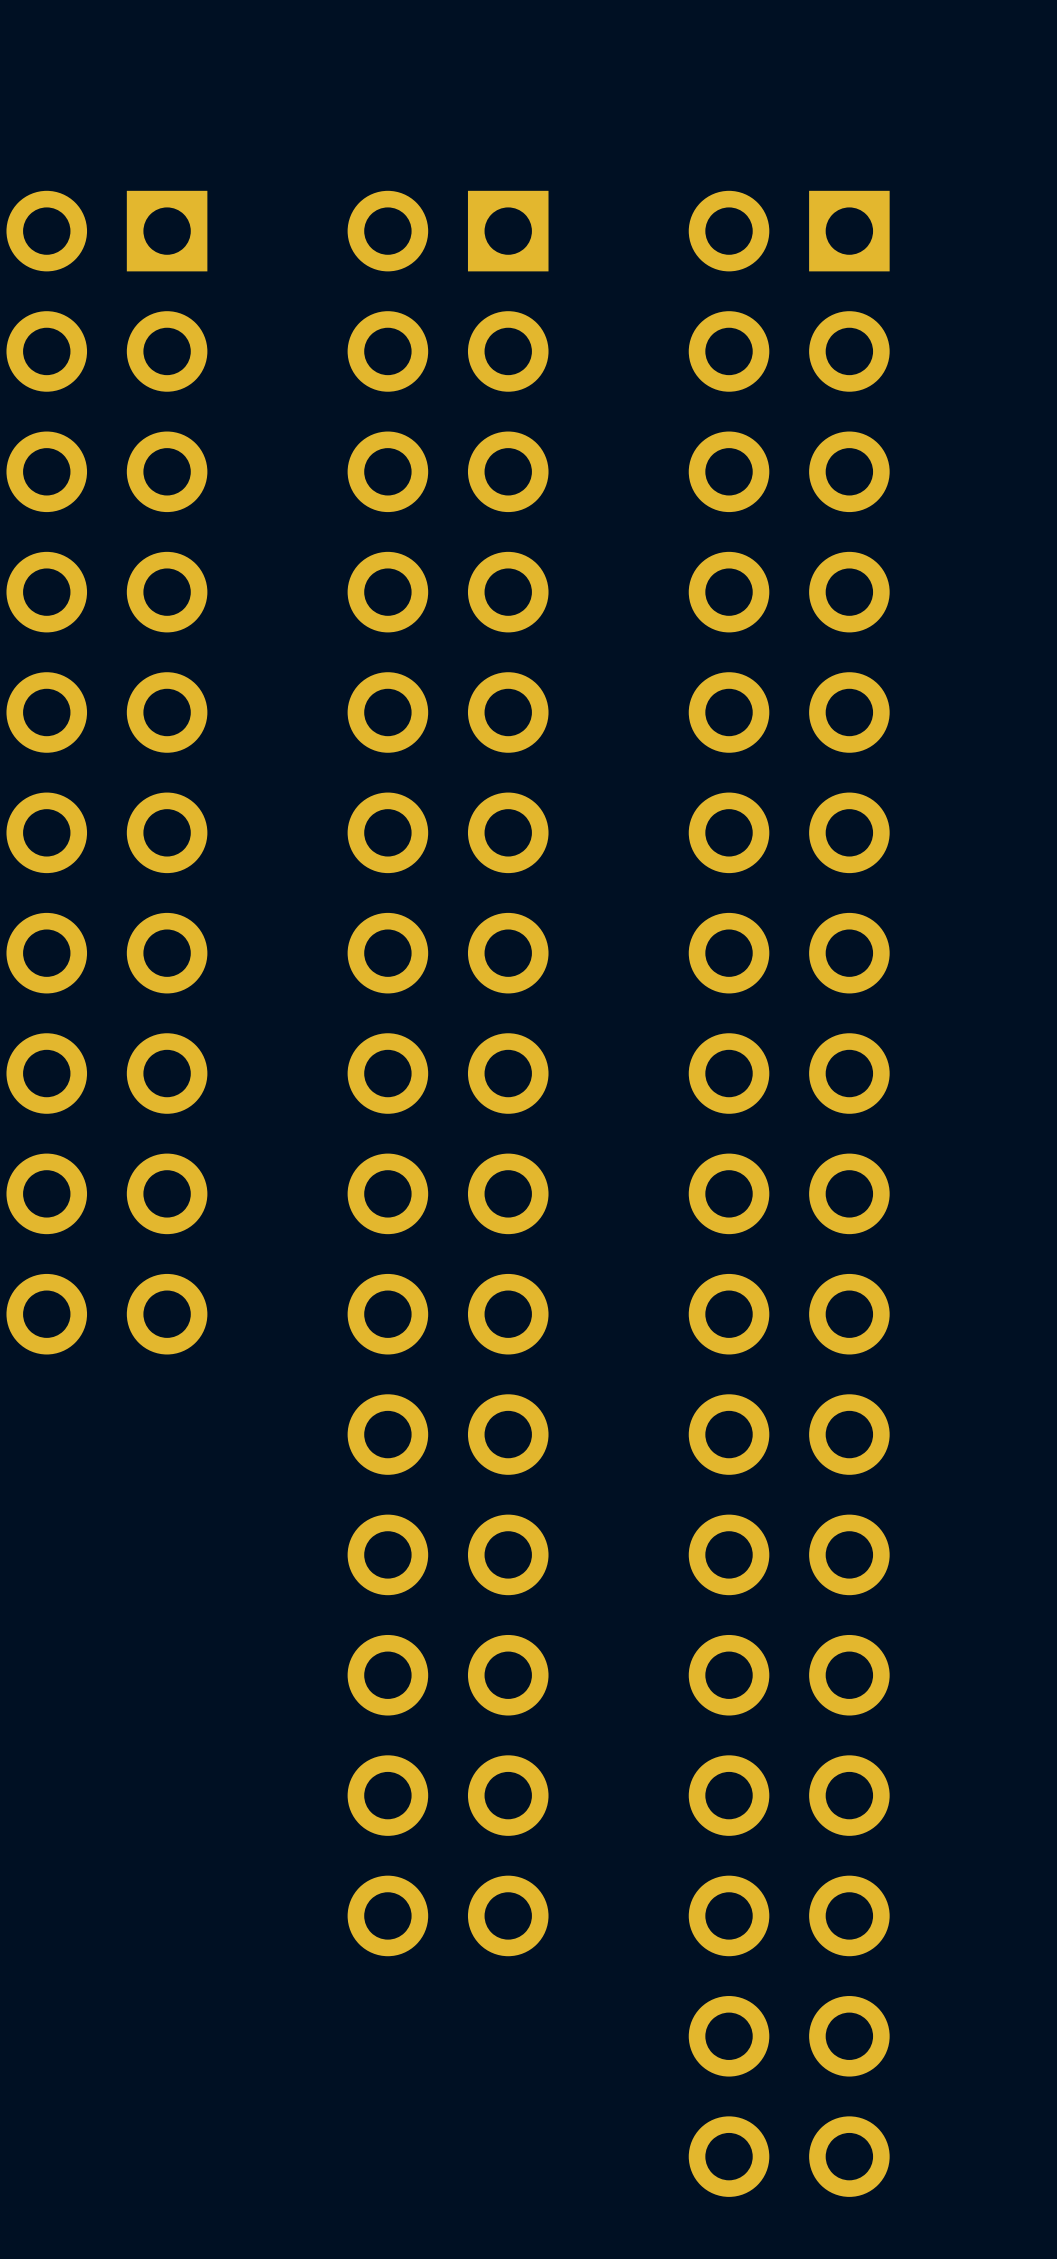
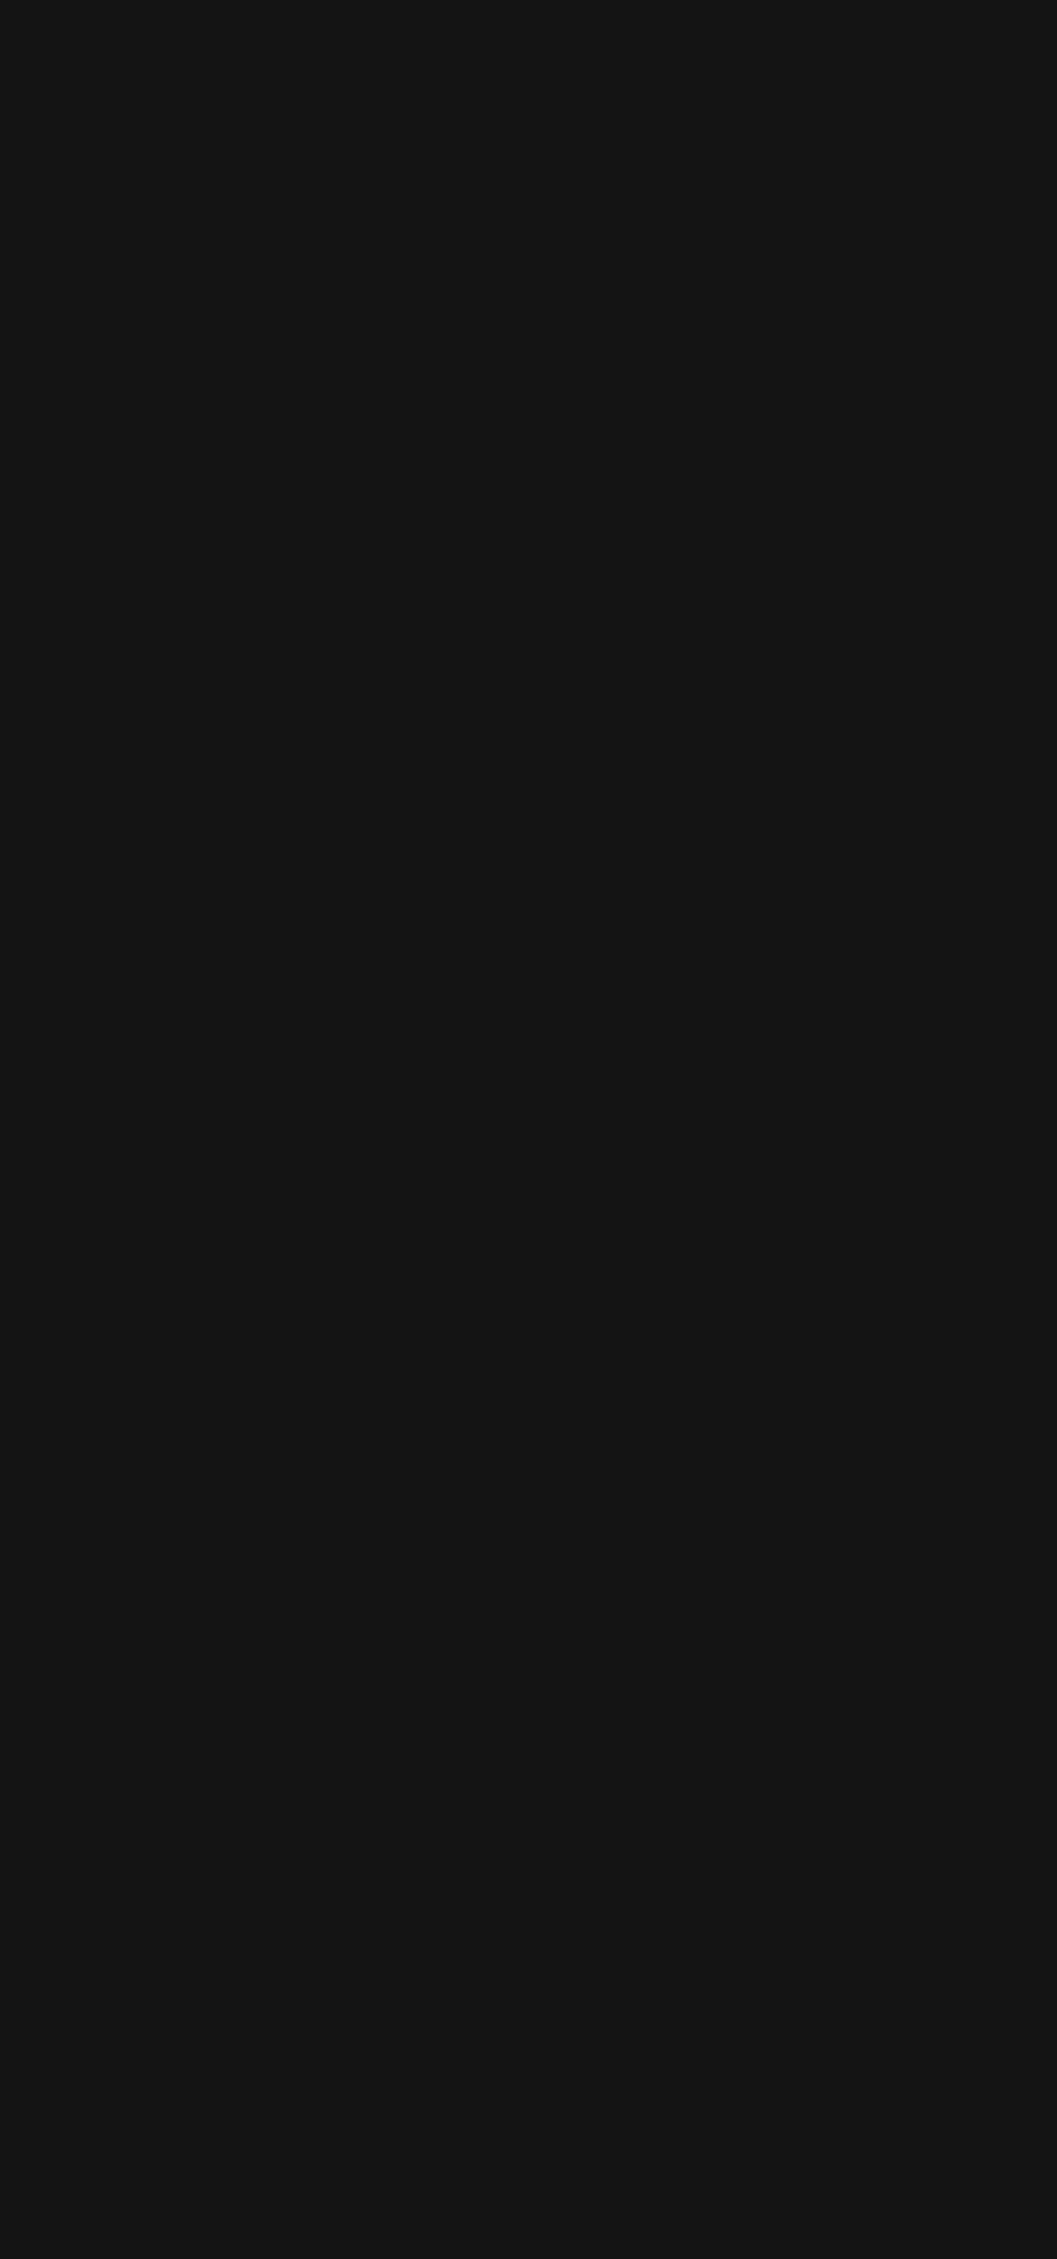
part: (106, 772) -> none
part: (448, 1073) -> none
part: (789, 1193) -> none

